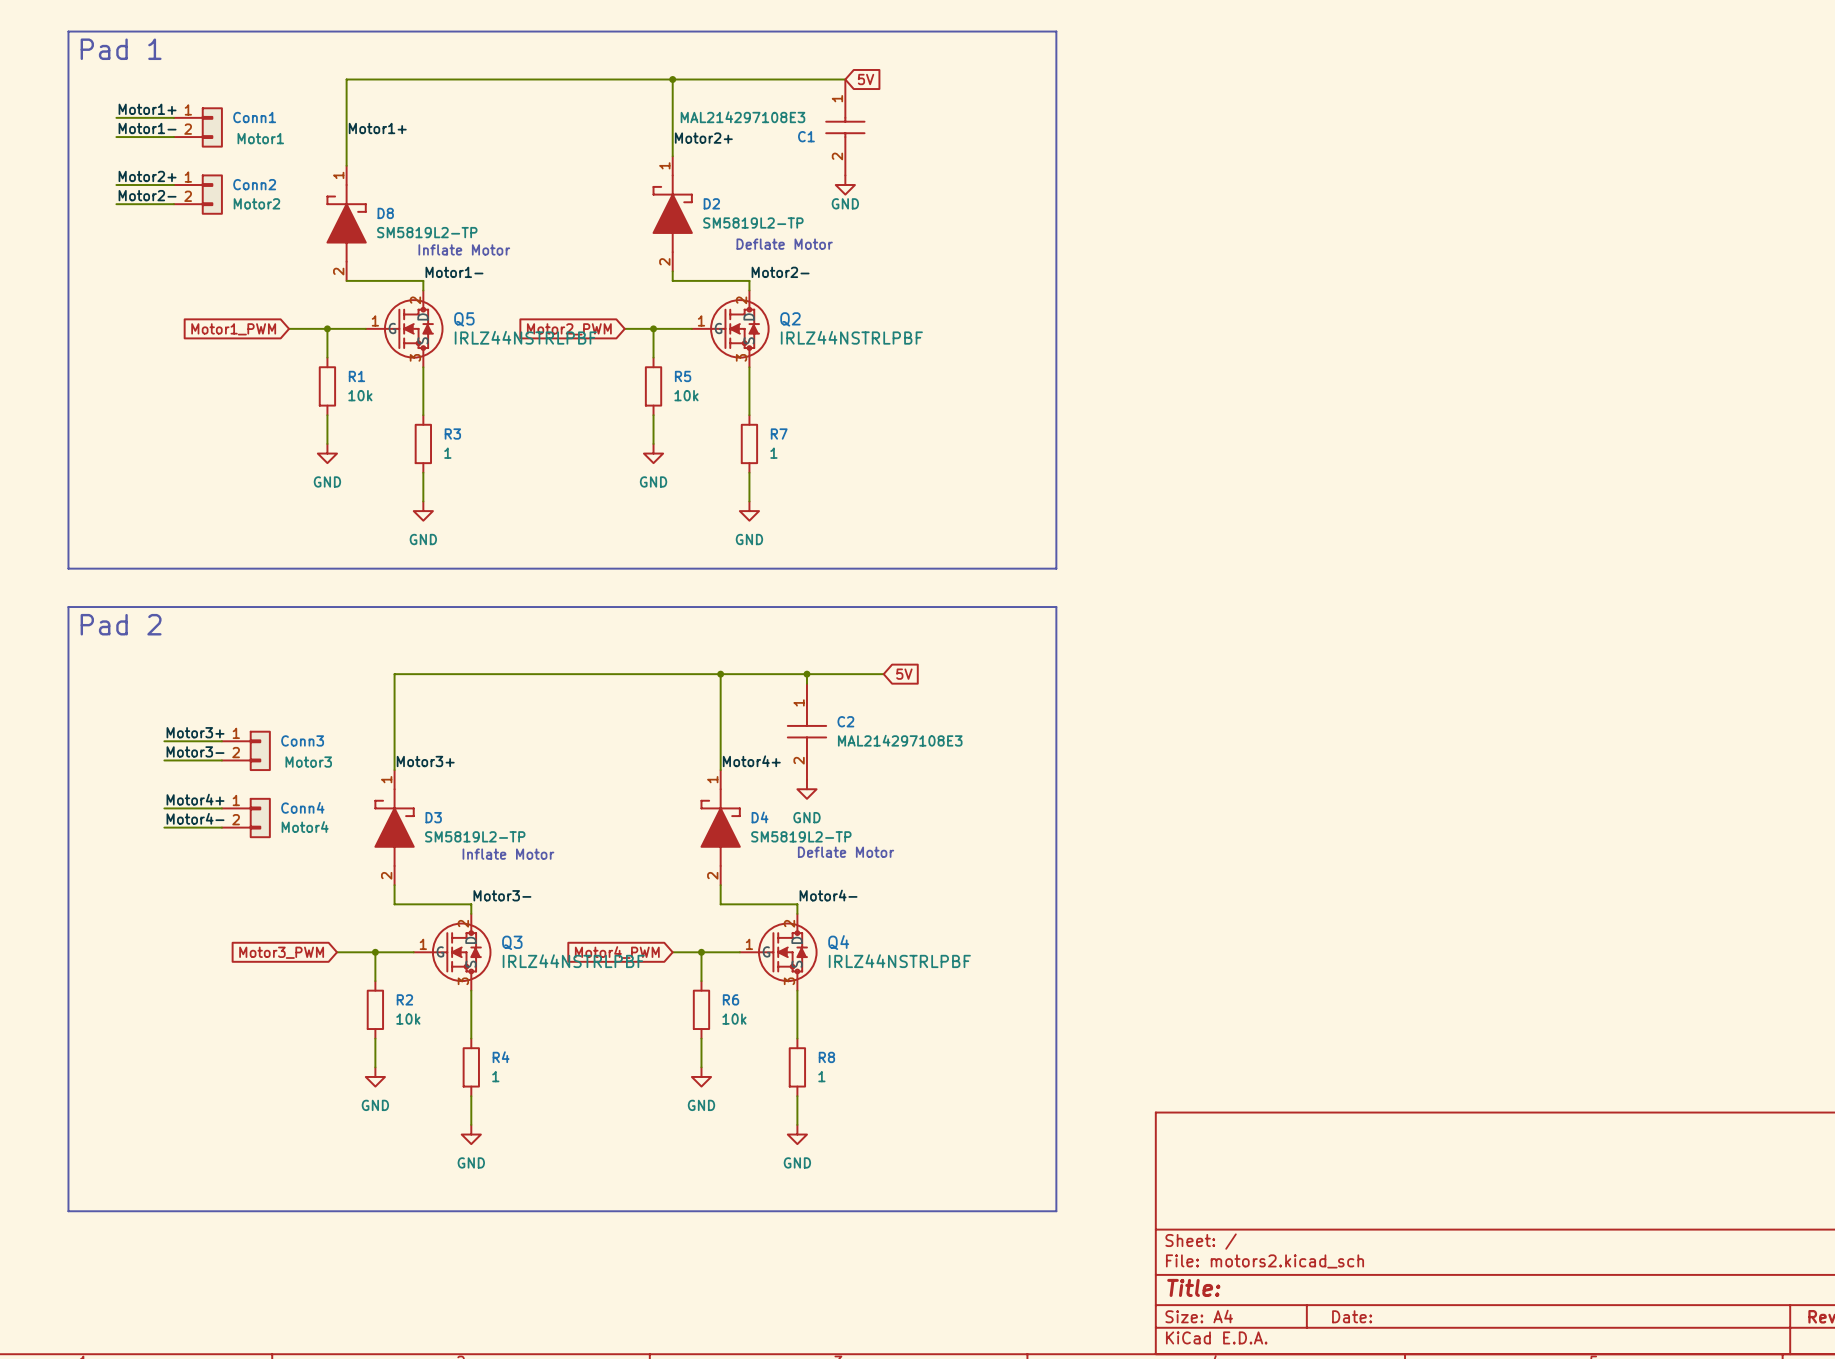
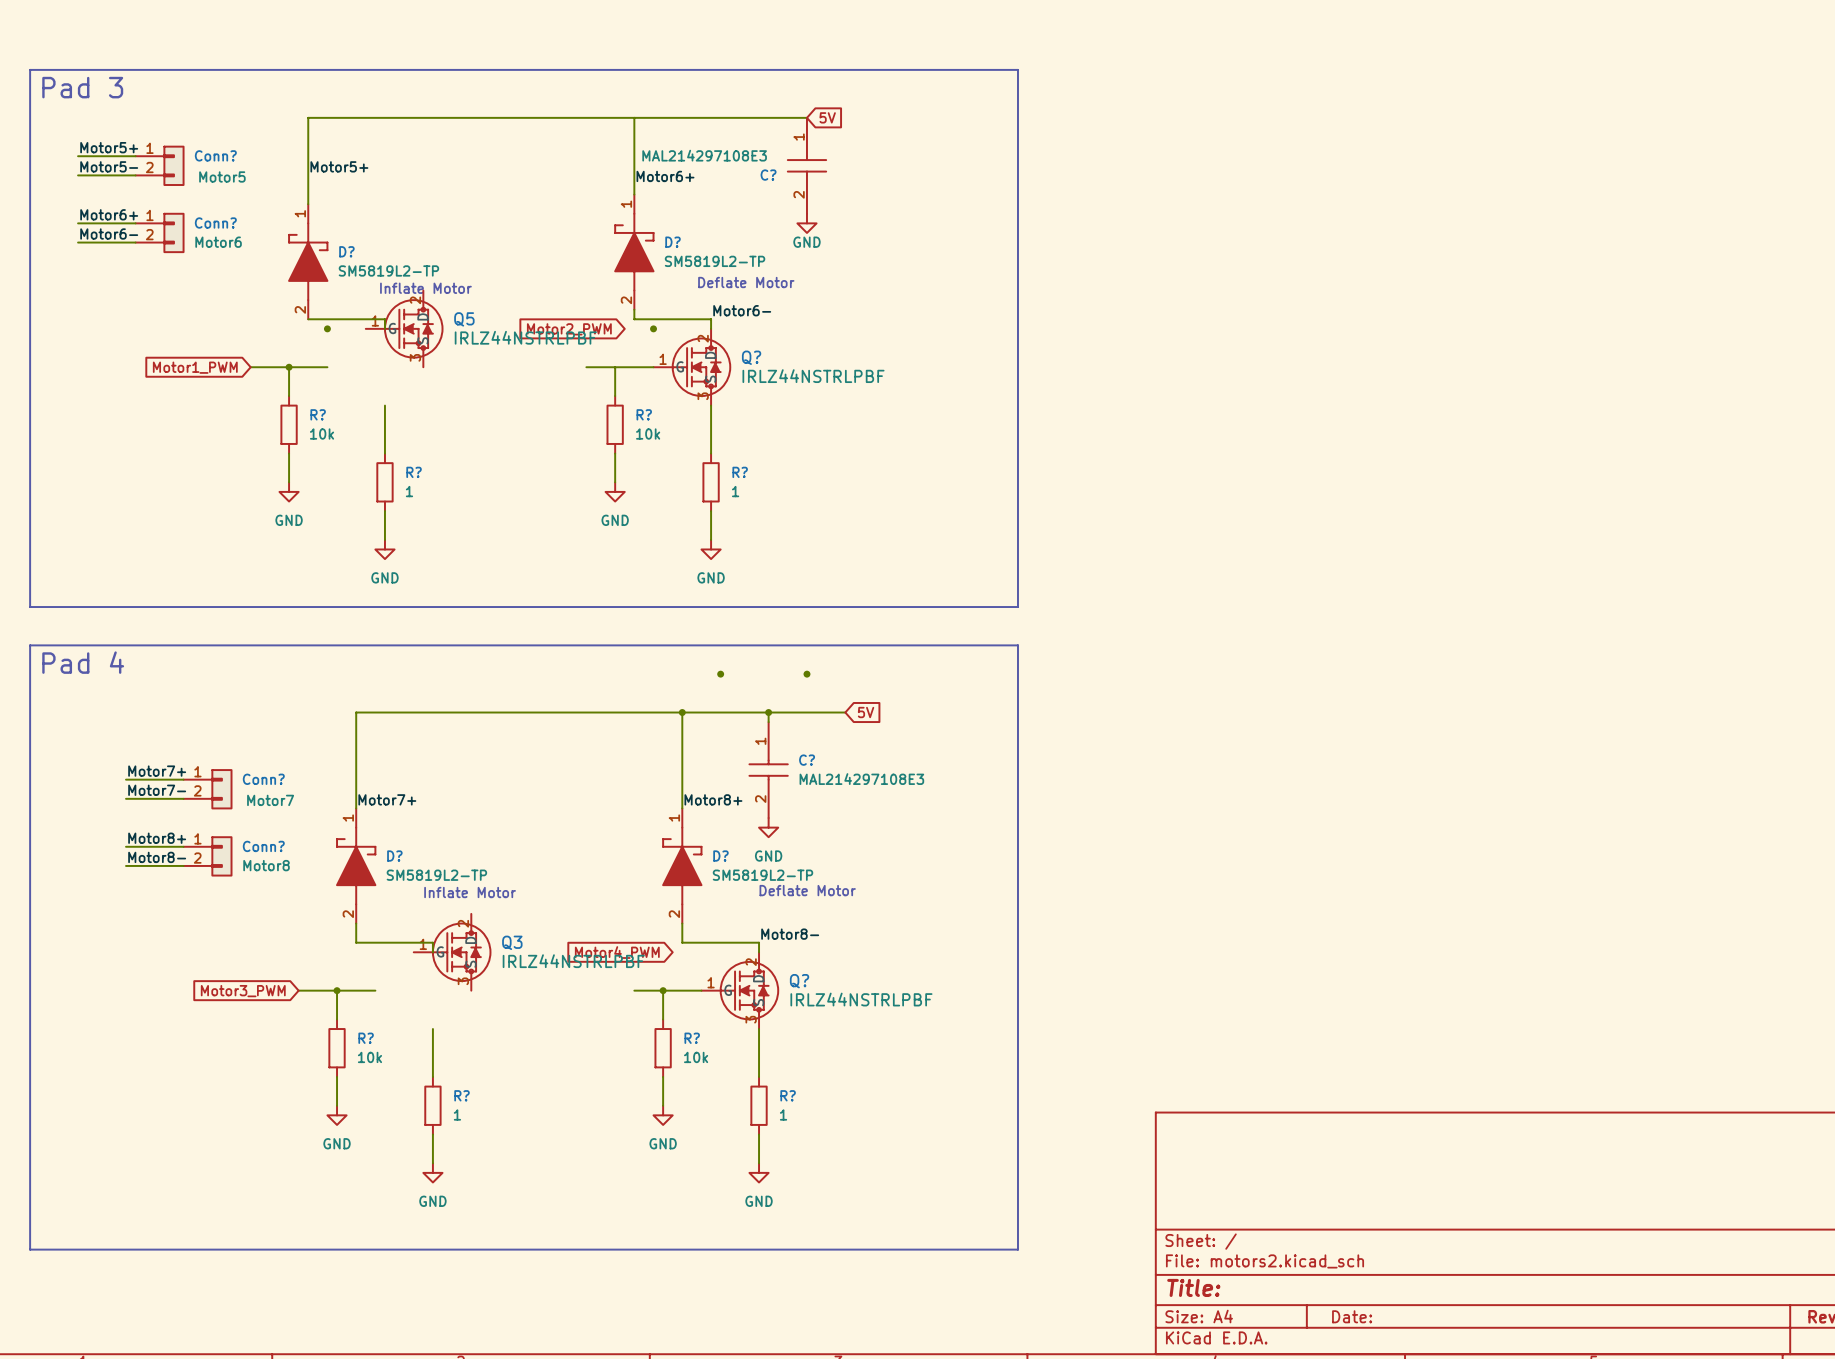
line: (68, 31) (1056, 31) (1056, 568) (68, 568) (68, 31) -> none
text: Pad 1 (121, 49) -> Pad 3 (82, 87)
wire: (672, 79) (672, 156) -> (634, 117) (634, 194)
junction: (672, 79) -> none
wire: (845, 79) (346, 79) (346, 165) -> (806, 117) (308, 117) (308, 204)
global label position: 5V (866, 79) -> 5V (827, 117)
label: Motor1+ (147, 109) -> none
wire: (116, 117) (173, 117) -> (78, 156) (135, 156)
Conn1: Motor1 (198, 127) -> none
C1: MAL214297108E3 (845, 127) -> none
label: Motor1- (147, 128) -> Motor5+ (109, 147)
label: Motor1+ (377, 128) -> none
wire: (116, 137) (173, 137) -> (78, 175) (135, 175)
label: Motor2+ (703, 138) -> none
Conn?: none -> Motor5 (160, 165)
C?: none -> MAL214297108E3 (806, 165)
label: none -> Motor5+ (339, 166)
label: Motor2+ (147, 176) -> Motor5- (109, 166)
label: none -> Motor6+ (665, 176)
wire: (116, 185) (173, 185) -> (78, 223) (135, 223)
power symbol position: GND (845, 185) -> GND (806, 223)
Conn2: Motor2 (198, 194) -> none
label: Motor2- (147, 195) -> Motor6+ (109, 214)
wire: (116, 204) (173, 204) -> (78, 242) (135, 242)
D2: SM5819L2-TP (672, 213) -> none
D8: SM5819L2-TP (346, 223) -> none
Conn?: none -> Motor6 (160, 232)
label: none -> Motor6- (109, 233)
text position: Deflate Motor (784, 244) -> Deflate Motor (746, 282)
text position: Inflate Motor (464, 249) -> Inflate Motor (425, 288)
D?: none -> SM5819L2-TP (634, 252)
D?: none -> SM5819L2-TP (308, 261)
wire: (672, 271) (672, 280) (749, 280) (749, 290) -> (634, 309) (634, 319) (711, 319) (711, 328)
label: Motor1- (454, 272) -> none
label: Motor2- (780, 272) -> none
wire: (346, 280) (423, 280) (423, 290) -> (308, 319) (384, 319) (384, 328)
label: none -> Motor6- (742, 310)
wire: (289, 328) (365, 328) -> (250, 367) (327, 367)
wire: (327, 328) (327, 357) -> (289, 367) (289, 396)
wire: (624, 328) (691, 328) -> (586, 367) (653, 367)
wire: (653, 328) (653, 357) -> (615, 367) (615, 396)
Q2: IRLZ44NSTRLPBF (730, 328) -> none
global label position: Motor1_PWM (233, 329) -> Motor1_PWM (195, 367)
junction: none -> (289, 367)
wire: (423, 367) (423, 415) -> (384, 405) (384, 453)
Q?: none -> IRLZ44NSTRLPBF (692, 367)
wire: (749, 367) (749, 415) -> (711, 405) (711, 453)
R1: 10k (327, 386) -> none
R5: 10k (653, 386) -> none
wire: (327, 415) (327, 443) -> (289, 453) (289, 482)
wire: (653, 415) (653, 443) -> (615, 453) (615, 482)
R?: none -> 10k (289, 424)
R?: none -> 10k (615, 424)
R3: 1 (423, 443) -> none
R7: 1 (749, 443) -> none
power symbol position: GND (327, 453) -> GND (289, 491)
power symbol position: GND (653, 453) -> GND (615, 491)
wire: (423, 472) (423, 501) -> (384, 511) (384, 539)
wire: (749, 472) (749, 501) -> (711, 511) (711, 539)
R?: none -> 1 (384, 482)
R?: none -> 1 (711, 482)
power symbol position: GND (423, 511) -> GND (384, 549)
power symbol position: GND (749, 511) -> GND (711, 549)
line: (68, 607) (68, 1211) (1056, 1211) (1056, 607) (1017, 607) -> (68, 607) (30, 607) (30, 69) (1017, 69) (1017, 607)
text: Pad 2 (121, 624) -> Pad 4 (83, 662)
line: none -> (30, 645) (30, 1249) (1017, 1249) (1017, 645) (30, 645)
wire: (720, 674) (720, 770) -> (682, 712) (682, 808)
wire: (806, 674) (806, 683) -> (768, 712) (768, 722)
wire: (883, 674) (394, 674) (394, 770) -> (845, 712) (356, 712) (356, 808)
global label position: 5V (904, 674) -> 5V (866, 712)
junction: none -> (682, 712)
junction: none -> (768, 712)
C2: MAL214297108E3 (806, 731) -> none
label: Motor3+ (195, 732) -> none
wire: (164, 741) (221, 741) -> (126, 779) (183, 779)
Conn3: Motor3 (246, 750) -> none
label: Motor3- (195, 751) -> Motor7+ (157, 771)
wire: (164, 760) (221, 760) -> (126, 798) (183, 798)
label: Motor3+ (425, 761) -> none
label: Motor4+ (751, 761) -> none
C?: none -> MAL214297108E3 (768, 770)
Conn?: none -> Motor7 (208, 789)
power symbol position: GND (806, 789) -> GND (768, 827)
label: Motor4+ (195, 799) -> Motor7- (157, 790)
label: none -> Motor7+ (387, 799)
label: none -> Motor8+ (713, 799)
wire: (164, 808) (221, 808) -> (126, 846) (183, 846)
label: Motor4- (195, 818) -> Motor8+ (157, 838)
Conn4: Motor4 (246, 818) -> none
wire: (164, 827) (221, 827) -> (126, 865) (183, 865)
D3: SM5819L2-TP (394, 827) -> none
D4: SM5819L2-TP (720, 827) -> none
text position: Deflate Motor (846, 852) -> Deflate Motor (807, 890)
text position: Inflate Motor (508, 854) -> Inflate Motor (470, 892)
Conn?: none -> Motor8 (208, 856)
label: none -> Motor8- (157, 857)
D?: none -> SM5819L2-TP (356, 865)
D?: none -> SM5819L2-TP (682, 865)
wire: (394, 885) (394, 904) (471, 904) (471, 913) -> (356, 923) (356, 942) (432, 942) (432, 952)
wire: (720, 885) (720, 904) (797, 904) (797, 913) -> (682, 923) (682, 942) (759, 942) (759, 952)
label: Motor3- (502, 895) -> none
label: Motor4- (828, 895) -> none
label: none -> Motor8- (790, 934)
global label position: Motor3_PWM (281, 952) -> Motor3_PWM (243, 991)
wire: (337, 952) (413, 952) -> (298, 990) (375, 990)
wire: (375, 952) (375, 981) -> (337, 990) (337, 1019)
junction: (375, 952) -> none
wire: (672, 952) (739, 952) -> (634, 990) (701, 990)
wire: (701, 952) (701, 981) -> (663, 990) (663, 1019)
junction: (701, 952) -> none
Q4: IRLZ44NSTRLPBF (778, 952) -> none
junction: none -> (337, 990)
wire: (471, 990) (471, 1038) -> (432, 1029) (432, 1076)
junction: none -> (663, 990)
Q?: none -> IRLZ44NSTRLPBF (740, 990)
wire: (797, 990) (797, 1038) -> (759, 1029) (759, 1076)
R2: 10k (375, 1009) -> none
R6: 10k (701, 1009) -> none
wire: (375, 1038) (375, 1067) -> (337, 1076) (337, 1105)
wire: (701, 1038) (701, 1067) -> (663, 1076) (663, 1105)
R?: none -> 10k (337, 1048)
R?: none -> 10k (663, 1048)
R4: 1 (471, 1067) -> none
R8: 1 (797, 1067) -> none
power symbol position: GND (375, 1076) -> GND (337, 1115)
power symbol position: GND (701, 1076) -> GND (663, 1115)
wire: (471, 1096) (471, 1124) -> (432, 1134) (432, 1163)
wire: (797, 1096) (797, 1124) -> (759, 1134) (759, 1163)
R?: none -> 1 (432, 1105)
R?: none -> 1 (759, 1105)
power symbol position: GND (471, 1134) -> GND (432, 1172)
power symbol position: GND (797, 1134) -> GND (759, 1172)

